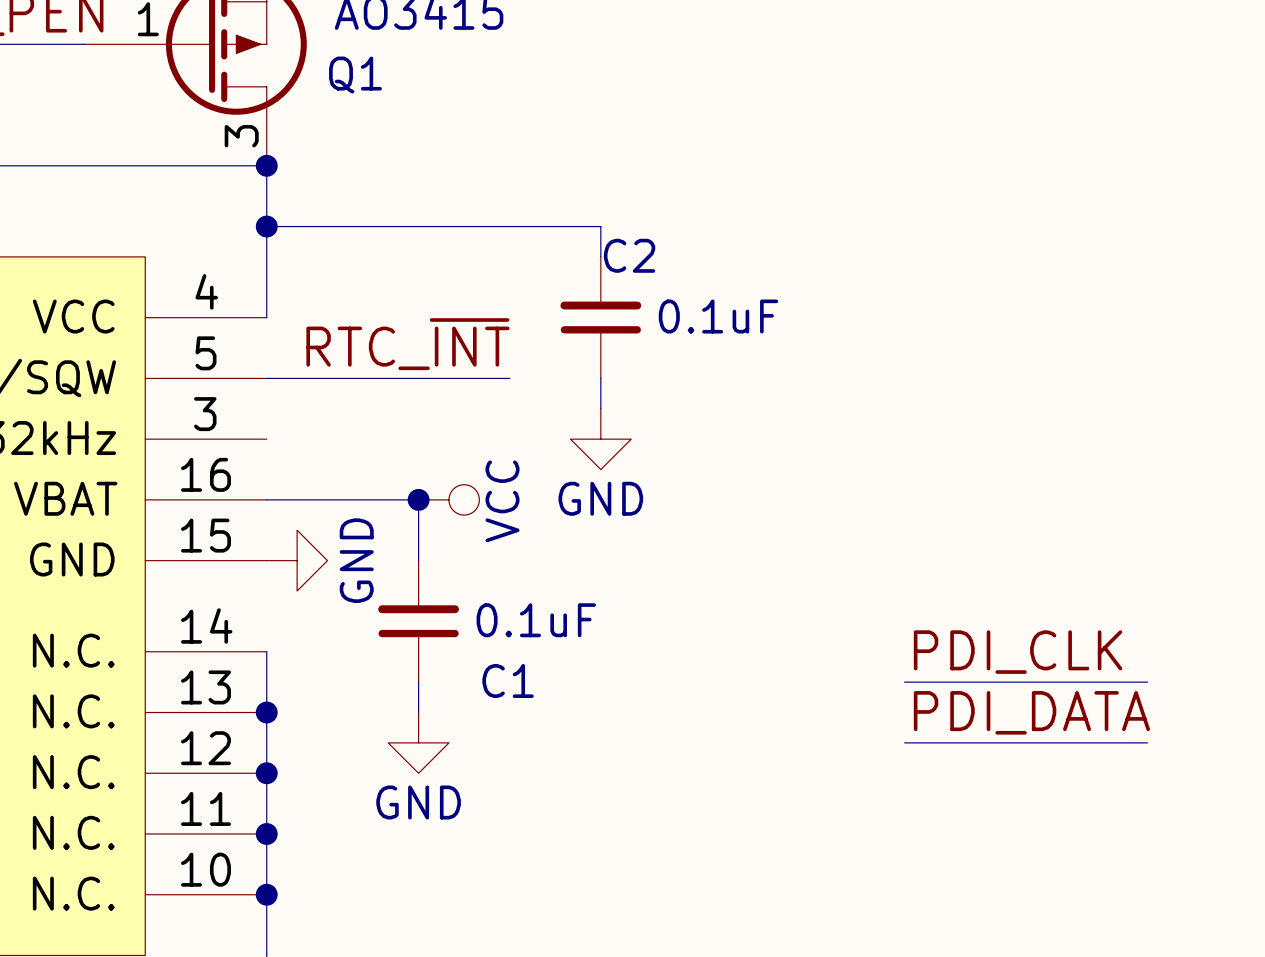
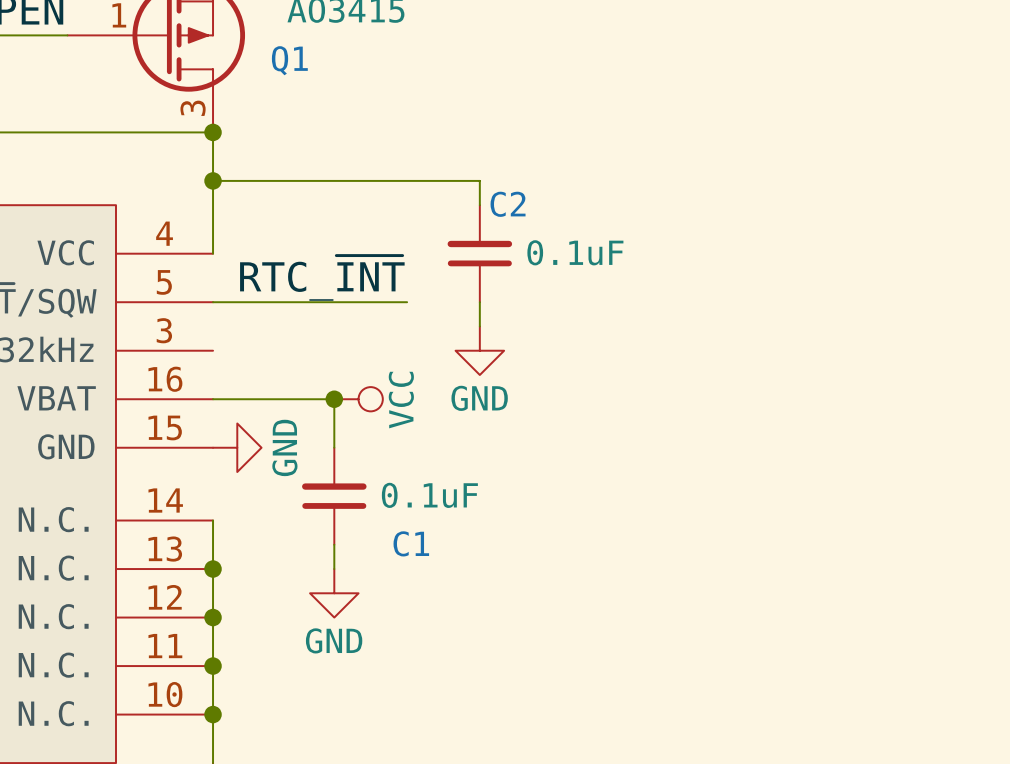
label: PDI_CLK (1018, 652) -> none
wire: (904, 682) (1147, 682) -> none
label: PDI_DATA (1031, 712) -> none
wire: (904, 742) (1147, 742) -> none

